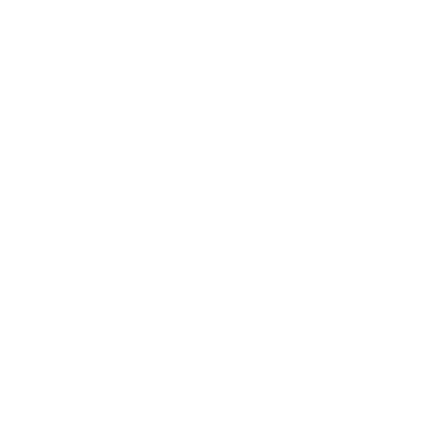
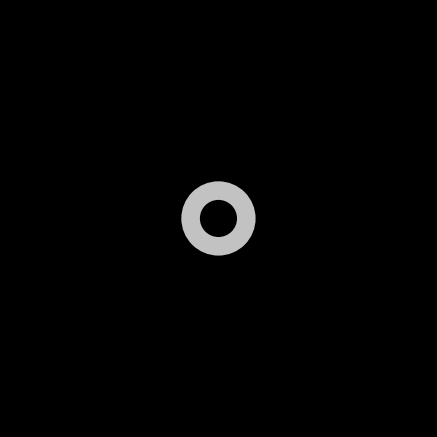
via: none -> (218, 218)

